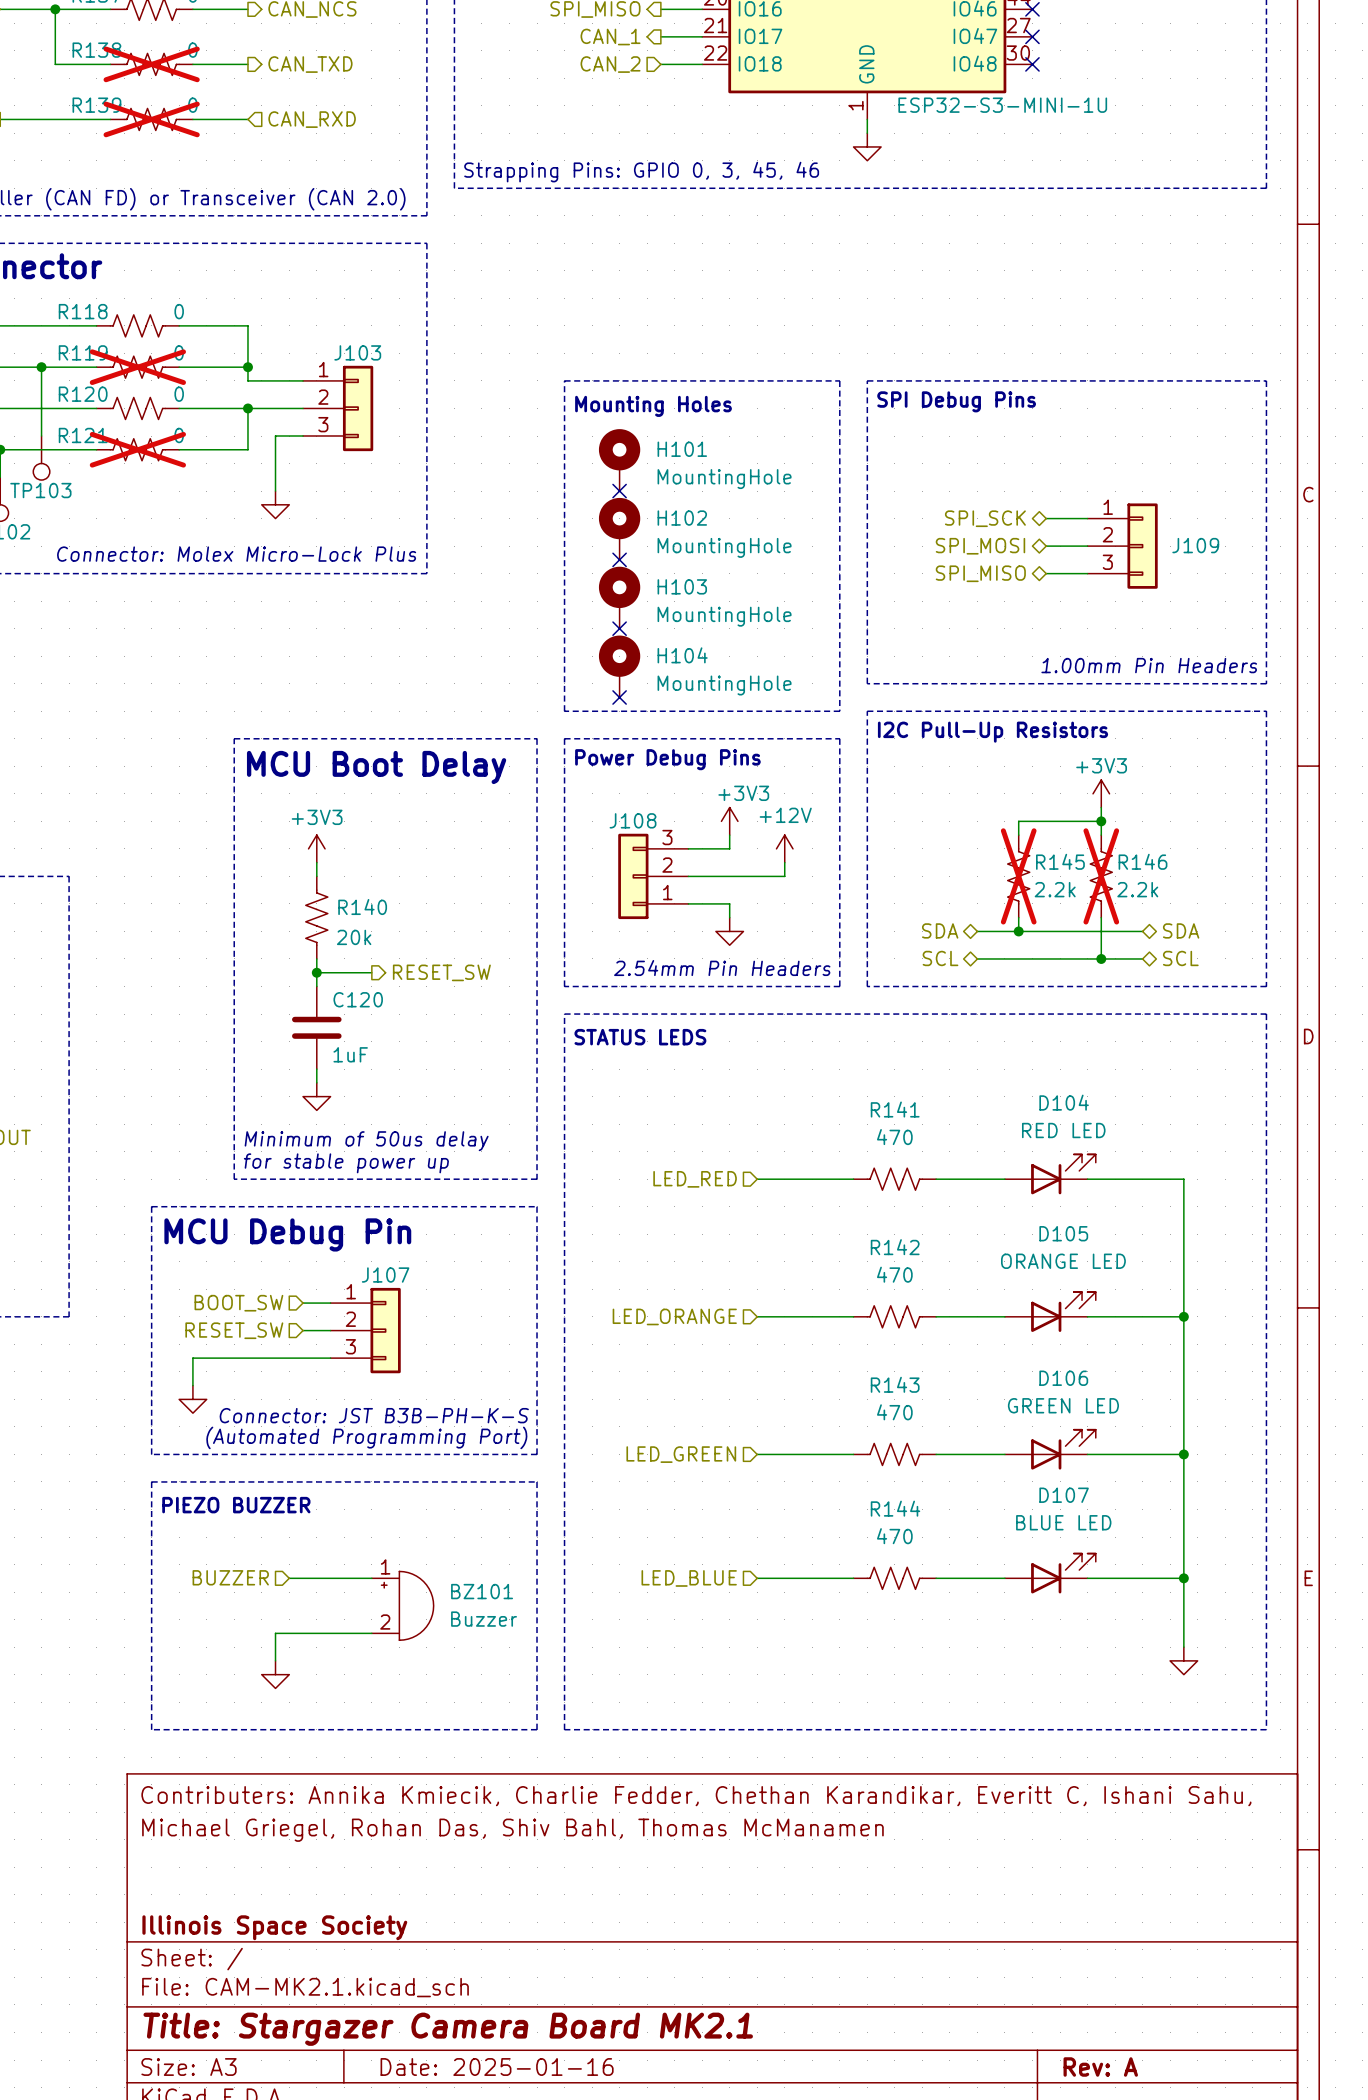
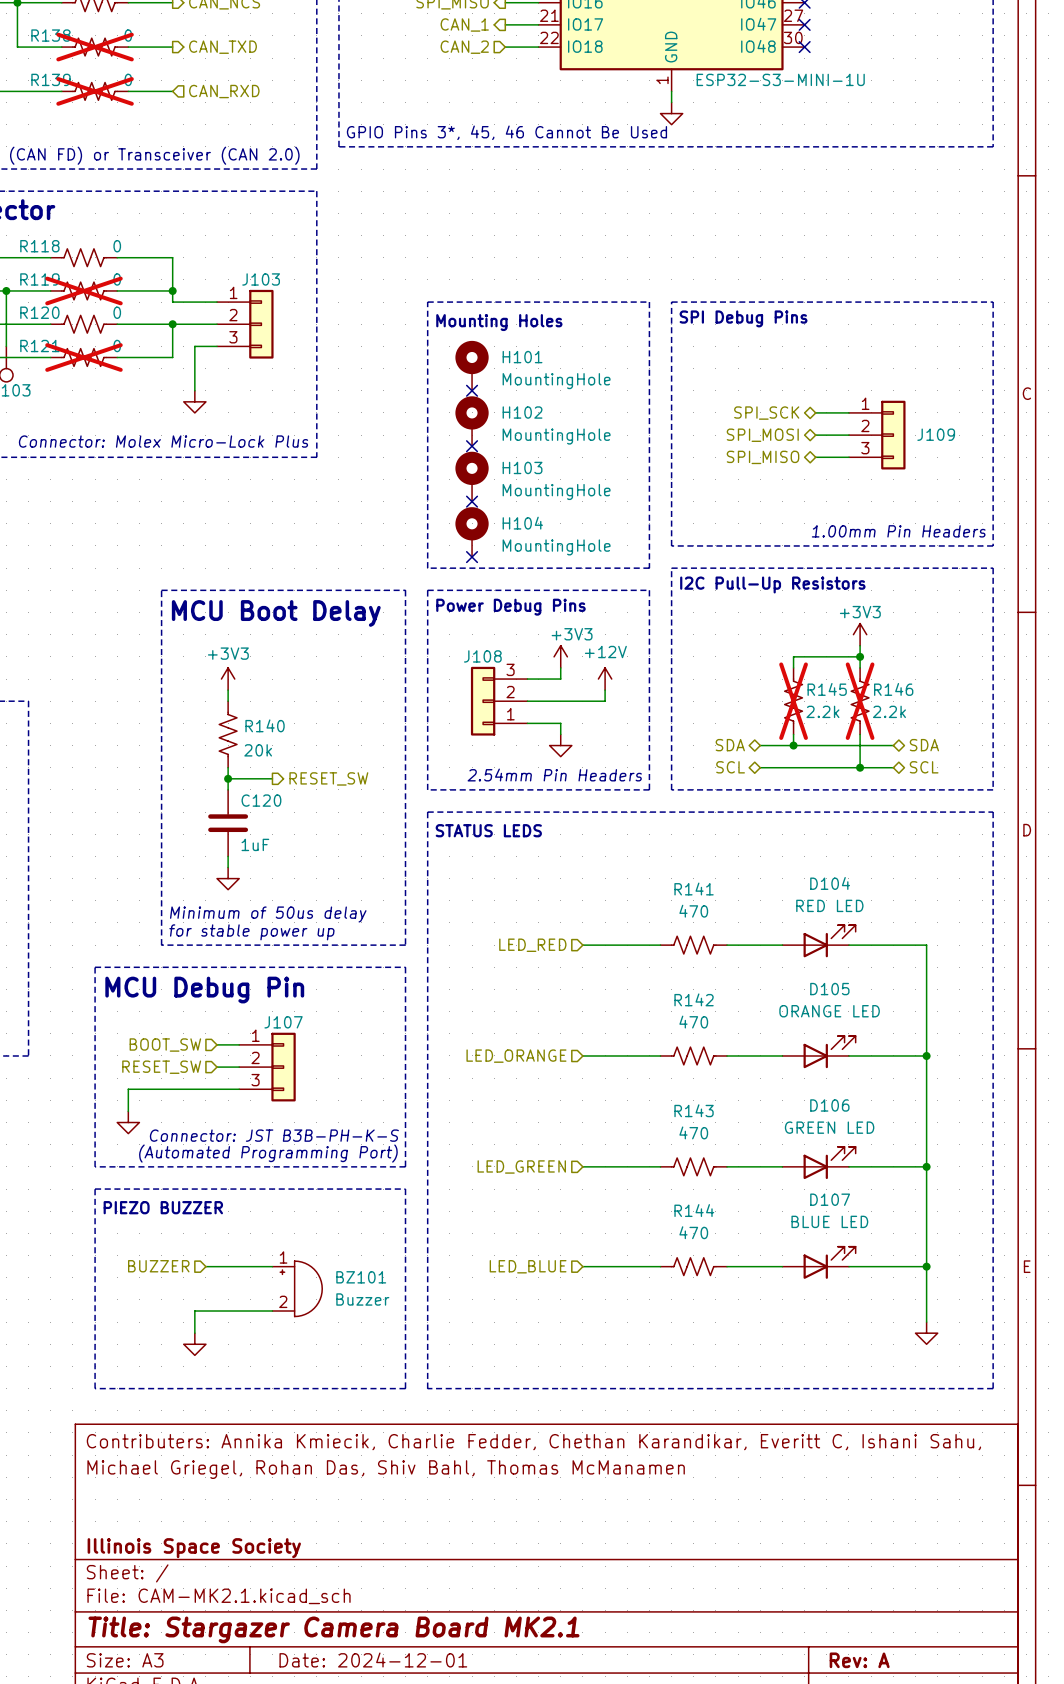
text: Strapping Pins: GPIO 0, 3, 45, 46 (641, 172) -> GPIO Pins 3*, 45, 46 Cannot Be Used (506, 132)
title block: Date: 2025-01-16 (497, 2067) -> Date: 2024-12-01 (373, 1660)

